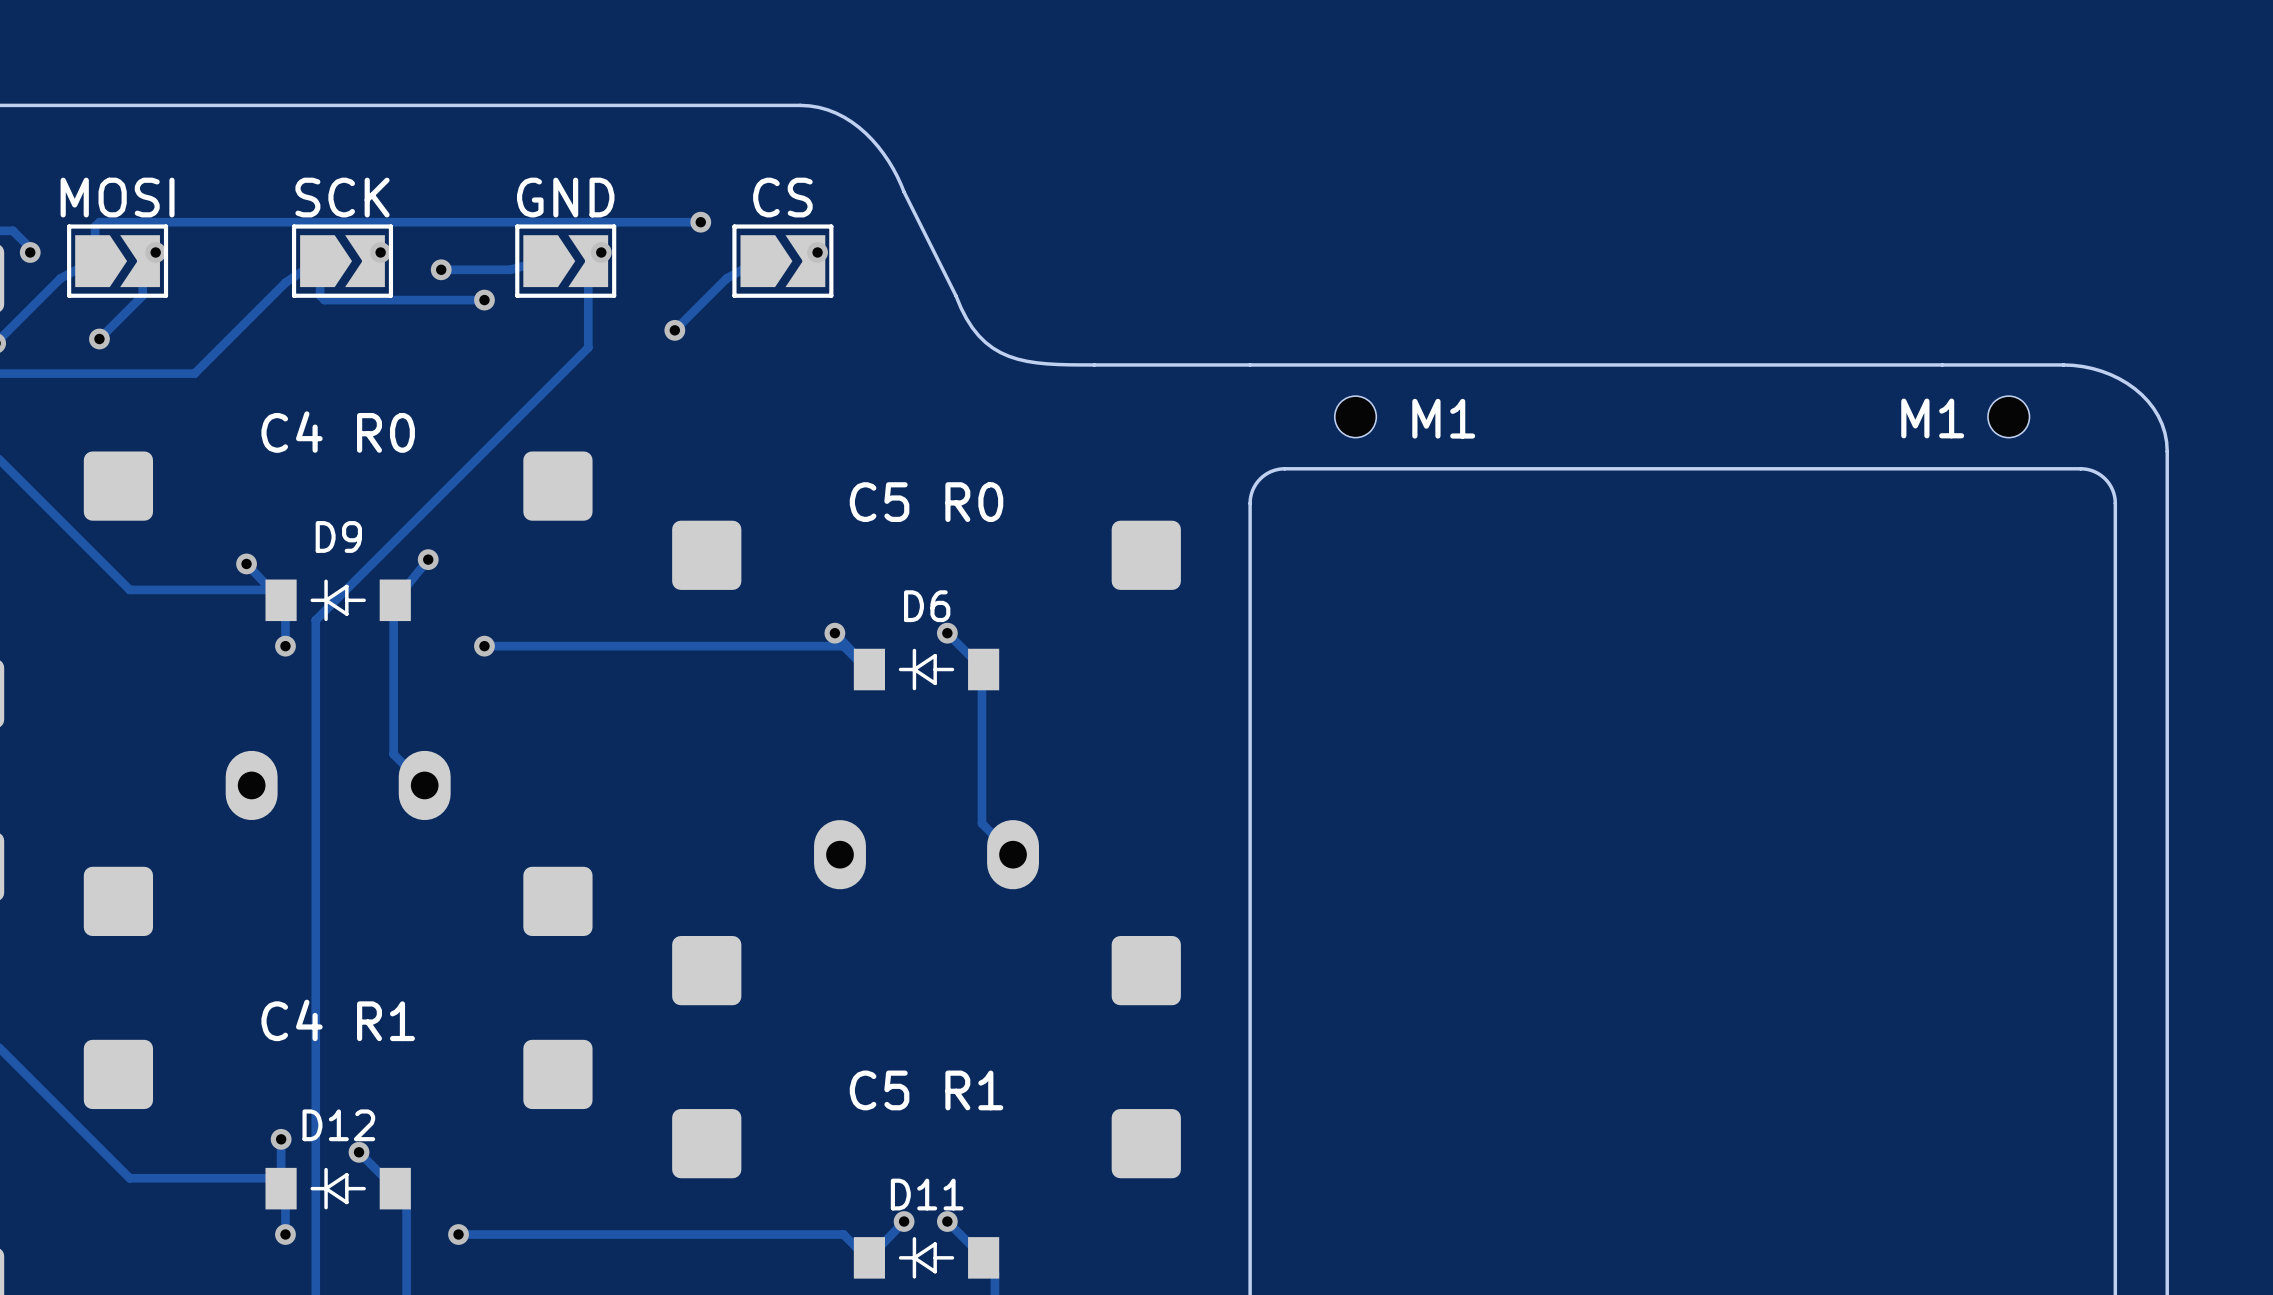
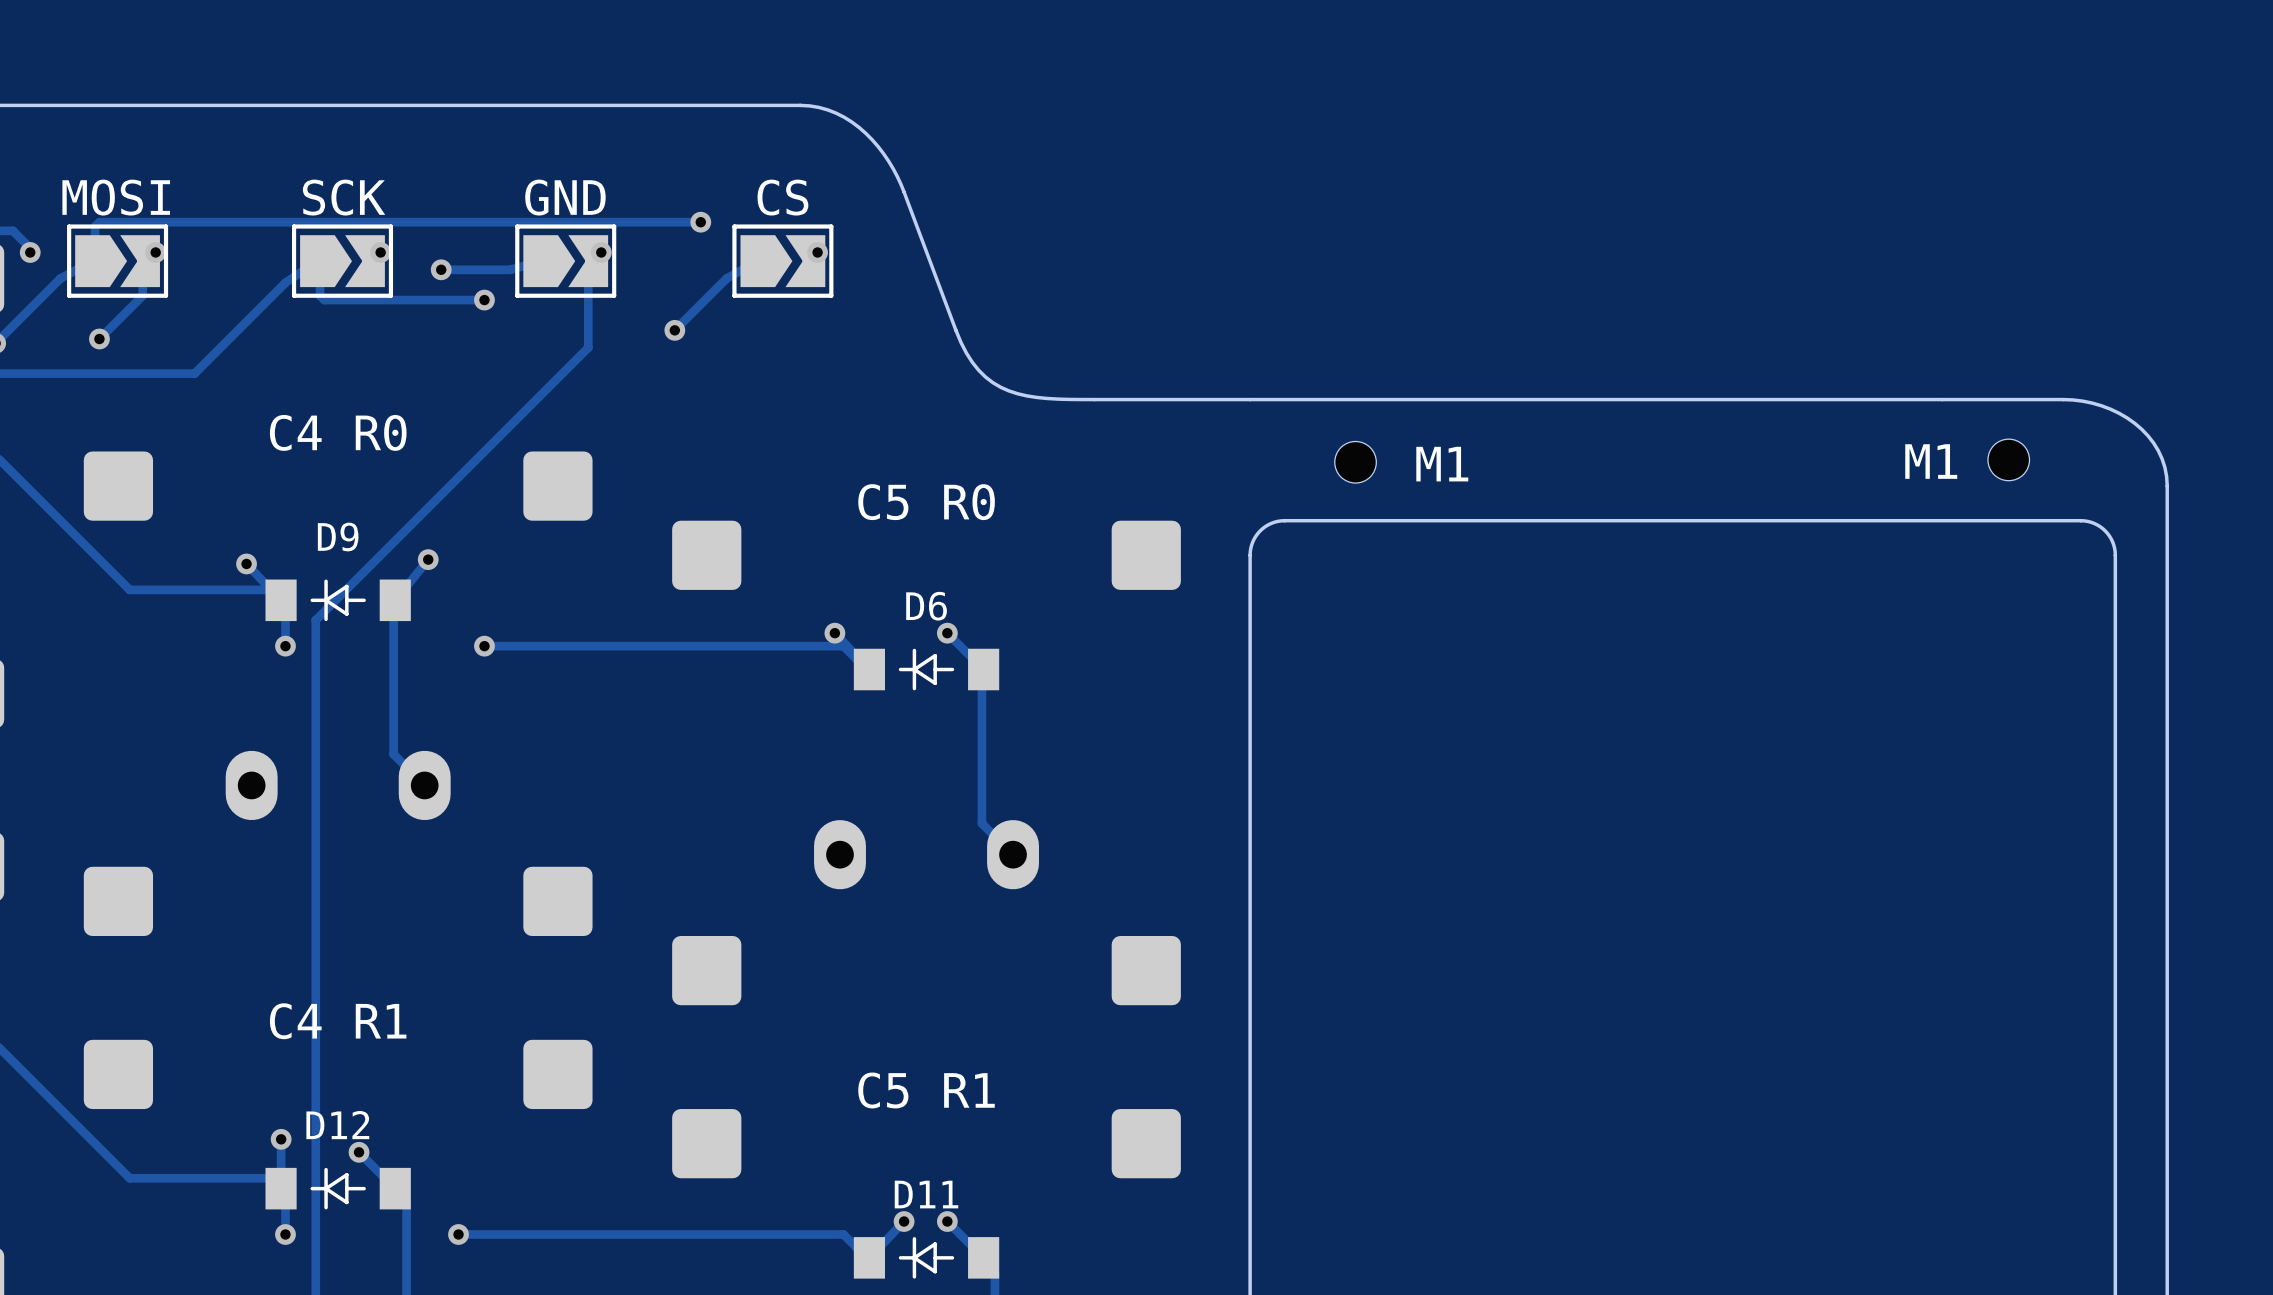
board edge: (904, 191) (972, 327) (992, 348) (1017, 359) (1047, 363) (1081, 364) (2073, 365) (2092, 368) (2119, 378) (2134, 388) (2148, 401) (2158, 416) (2164, 432) (2167, 451) (2167, 486) -> (904, 191) (955, 330) (966, 353) (985, 377) (1000, 387) (1017, 393) (1047, 398) (1081, 399) (2073, 399) (2092, 403) (2110, 409) (2127, 417) (2141, 429) (2153, 443) (2162, 458) (2167, 486)
M1 position: (1355, 416) -> (1355, 462)
M1 position: (2008, 416) -> (2008, 459)
board edge: (1250, 555) (1250, 503) (1252, 489) (1265, 474) (1274, 470) (1284, 468) (2084, 468) (2102, 476) (2113, 493) (2115, 555) -> (1250, 555) (1252, 541) (1260, 530) (1271, 523) (1284, 520) (2080, 520) (2094, 523) (2105, 530) (2112, 541) (2115, 555)

